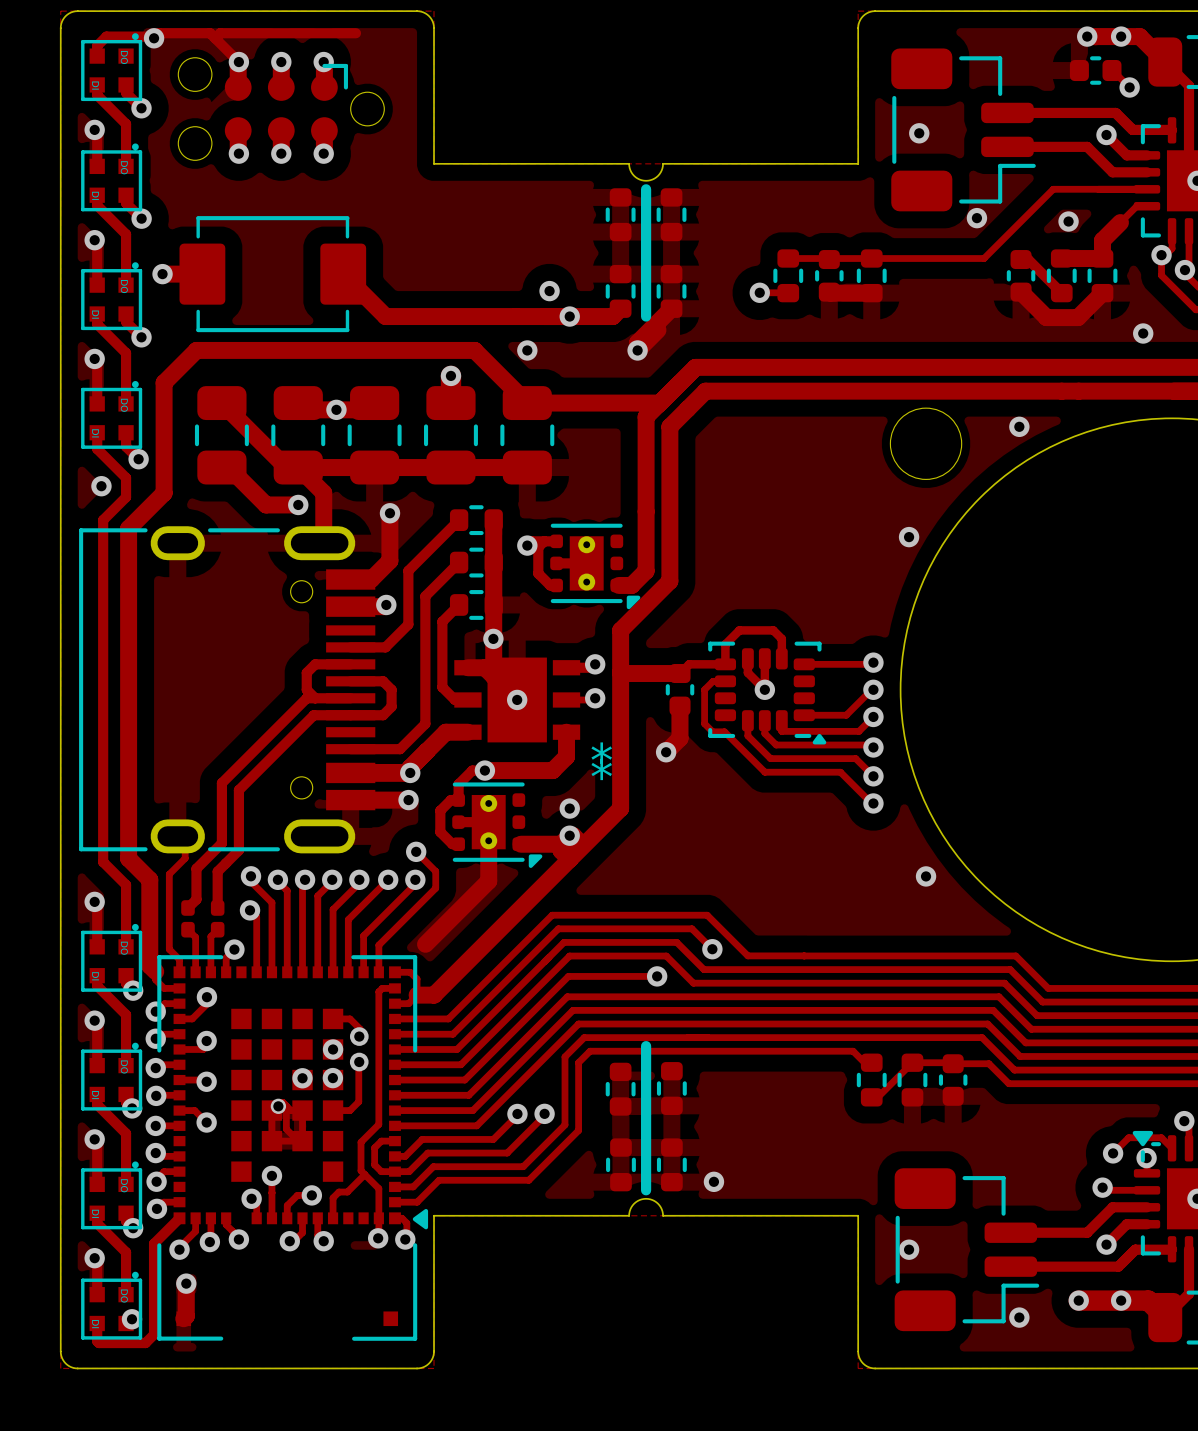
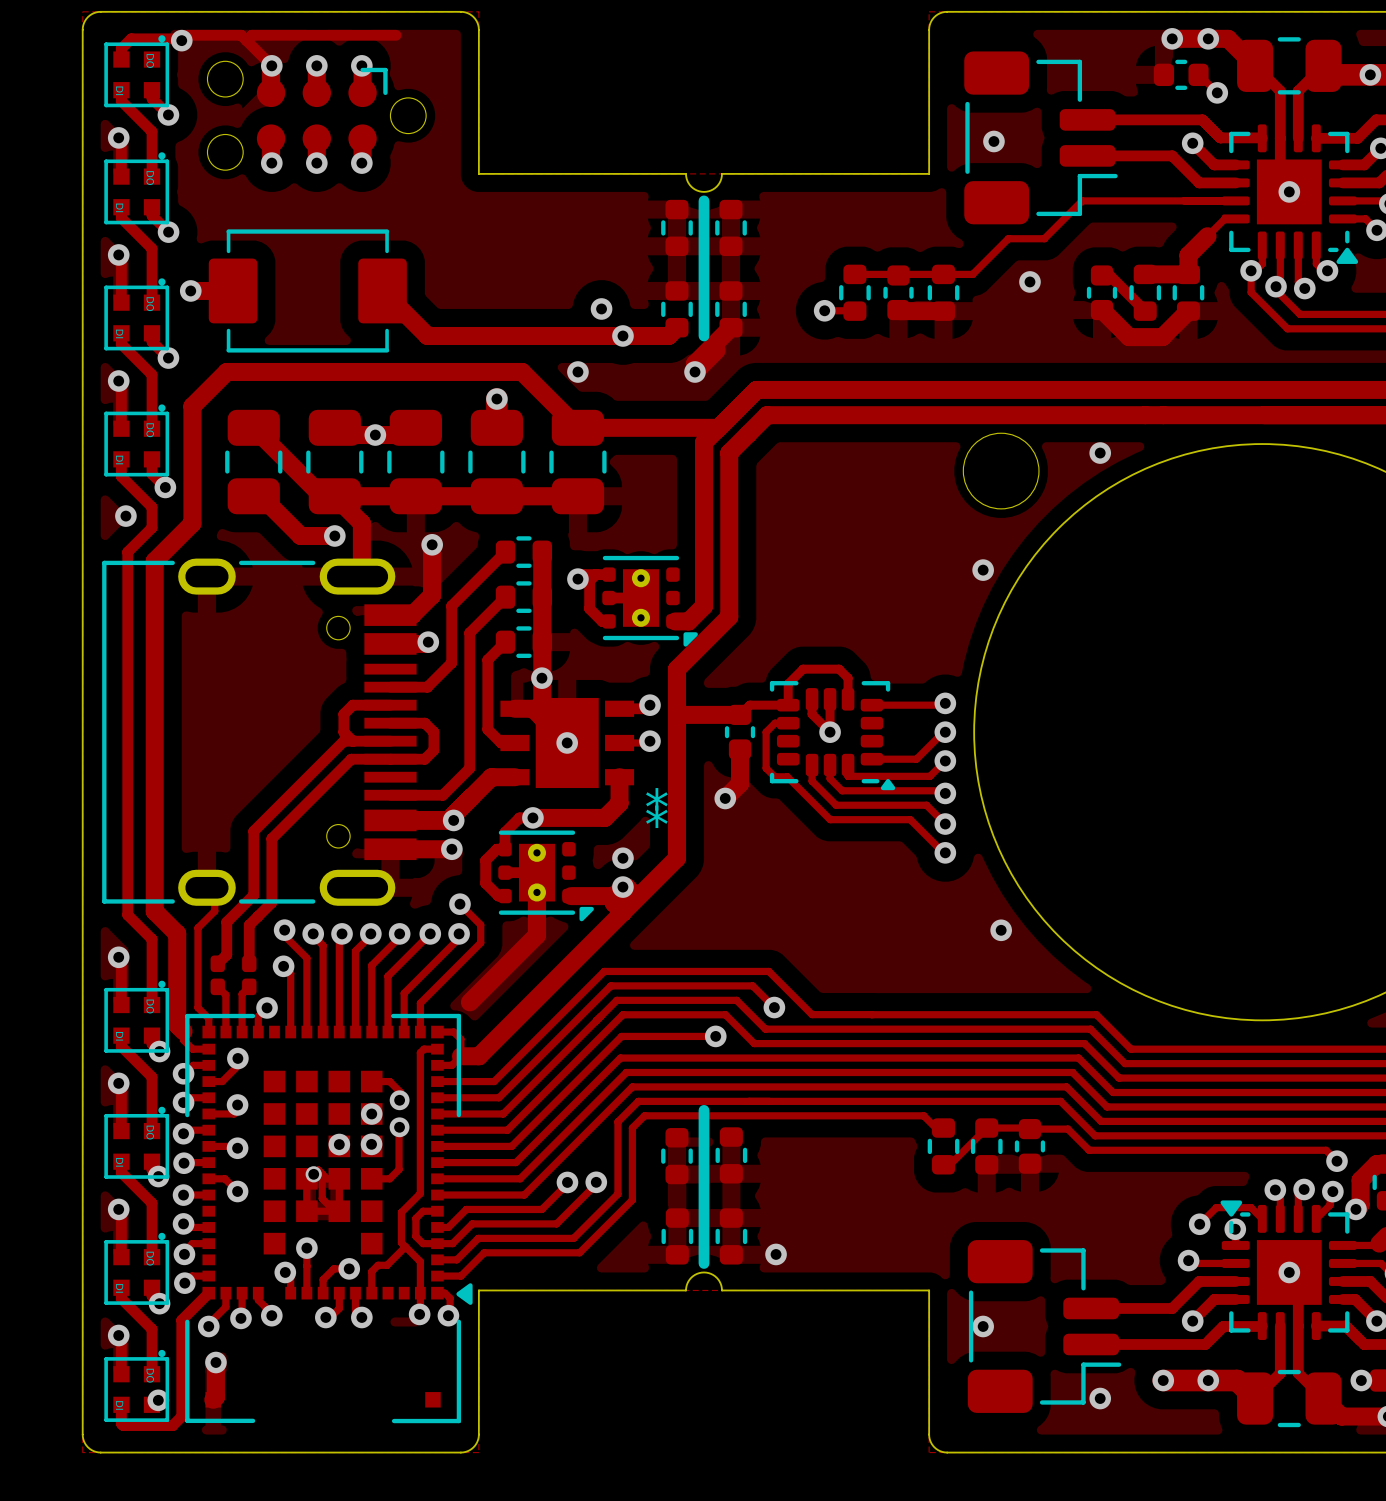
track: (1053, 189) (984, 258) (899, 258) -> (1136, 200) (1082, 200) (1044, 238) (1008, 238) (972, 274)
via position: (976, 218) -> (1029, 281)
via: (1068, 221) -> none
via: (1143, 333) -> none

